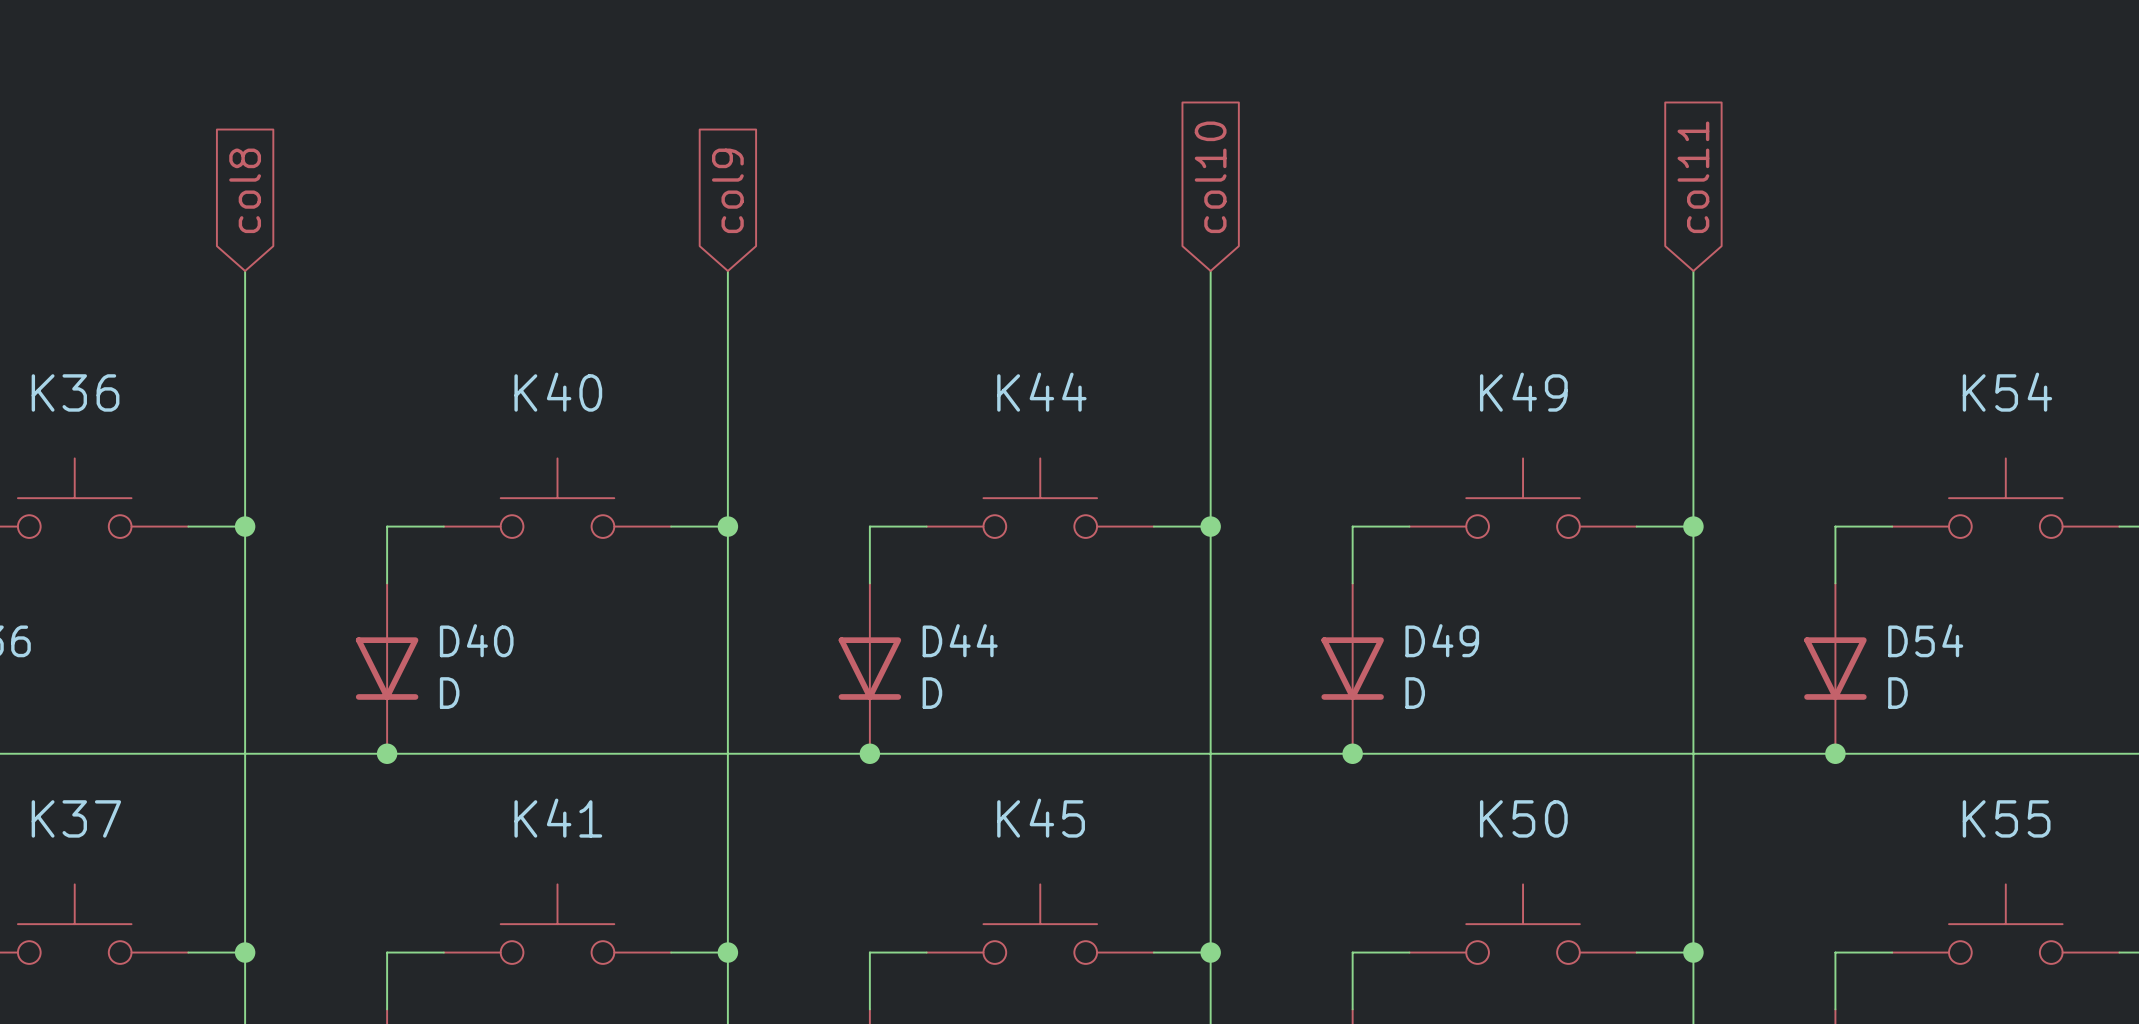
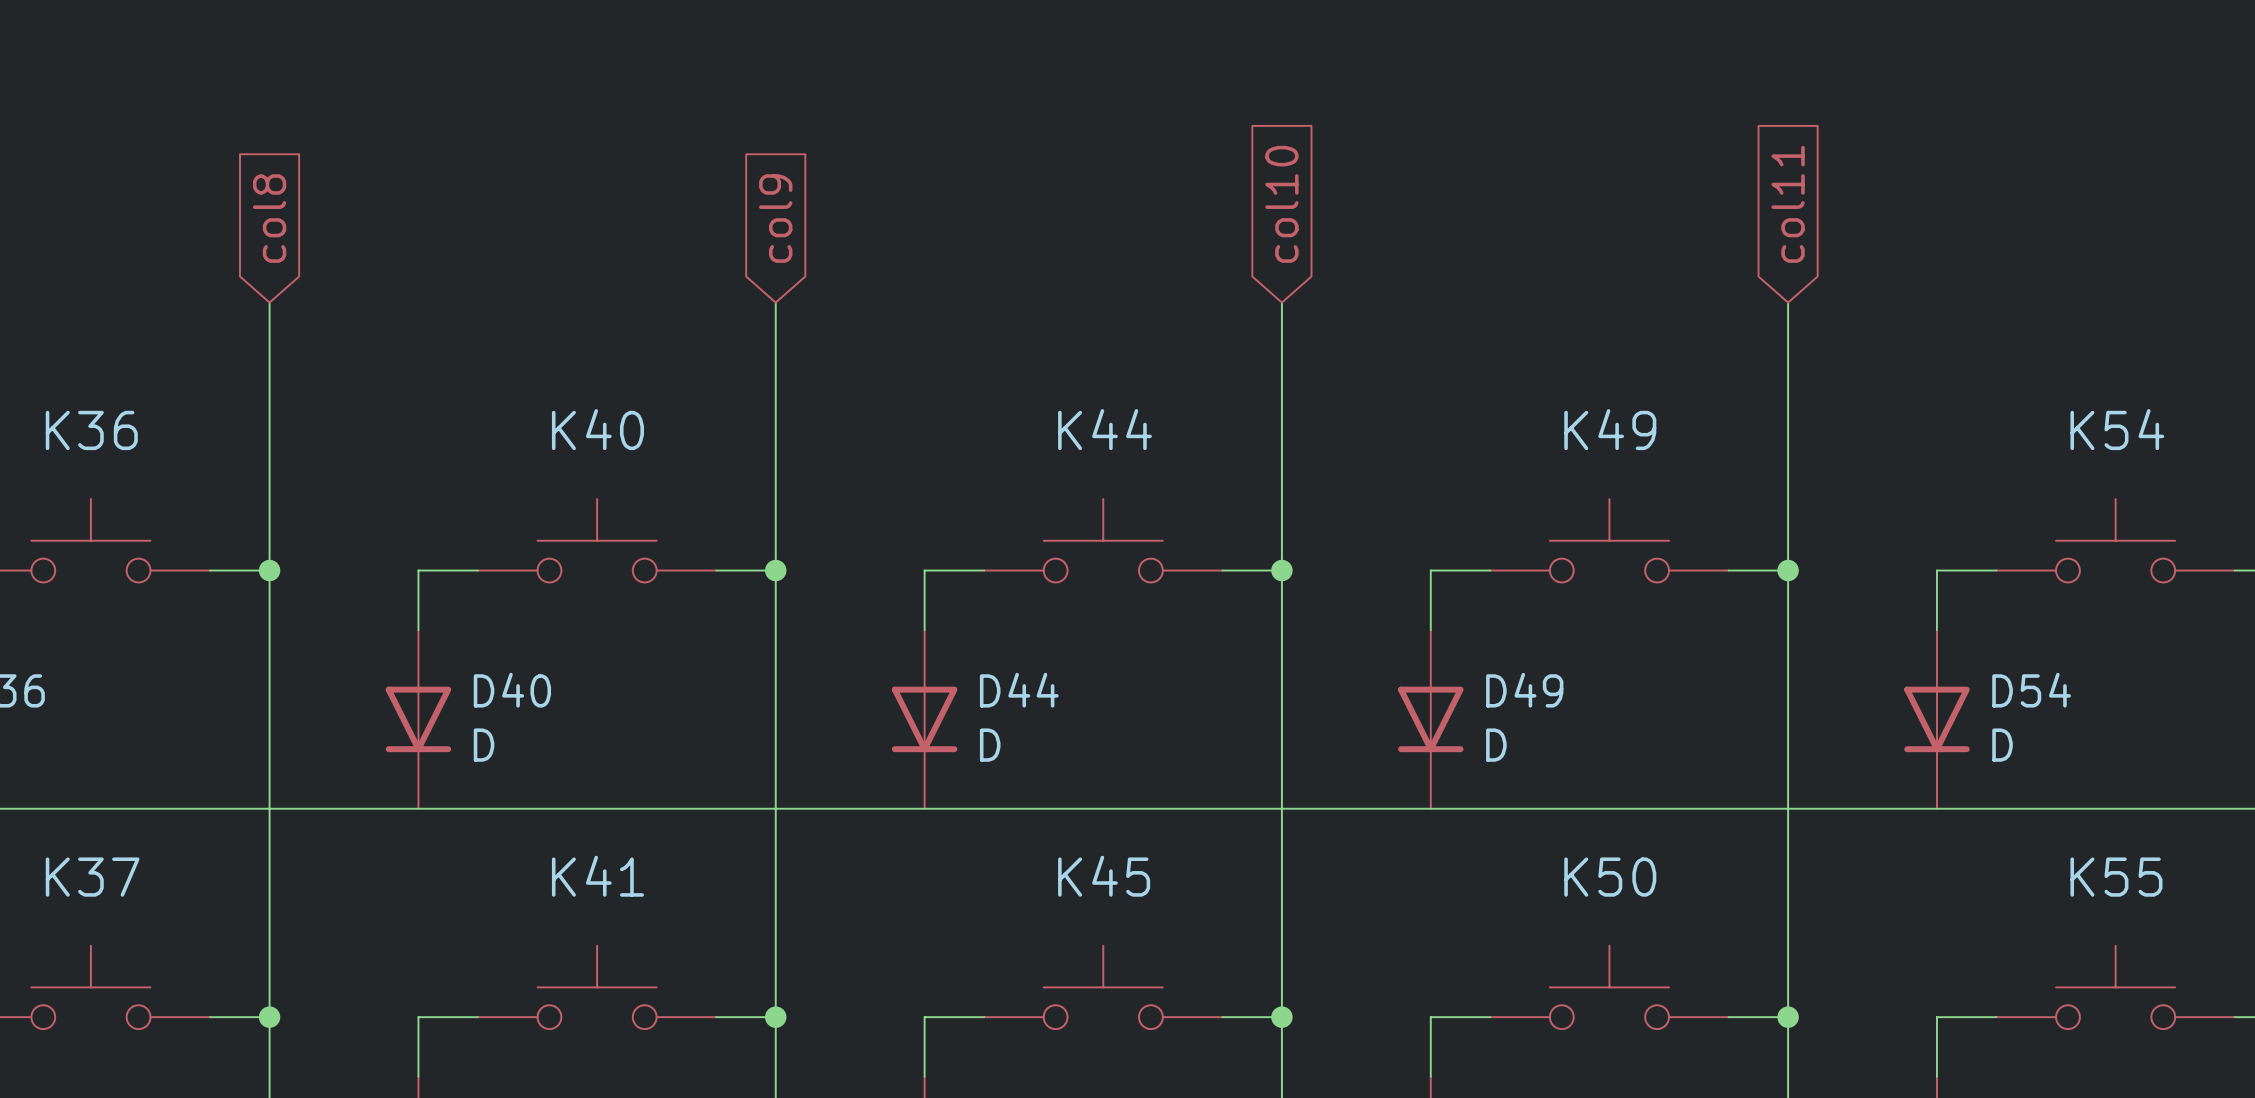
junction: (387, 753) -> none
junction: (869, 753) -> none
junction: (1352, 753) -> none
junction: (1835, 753) -> none

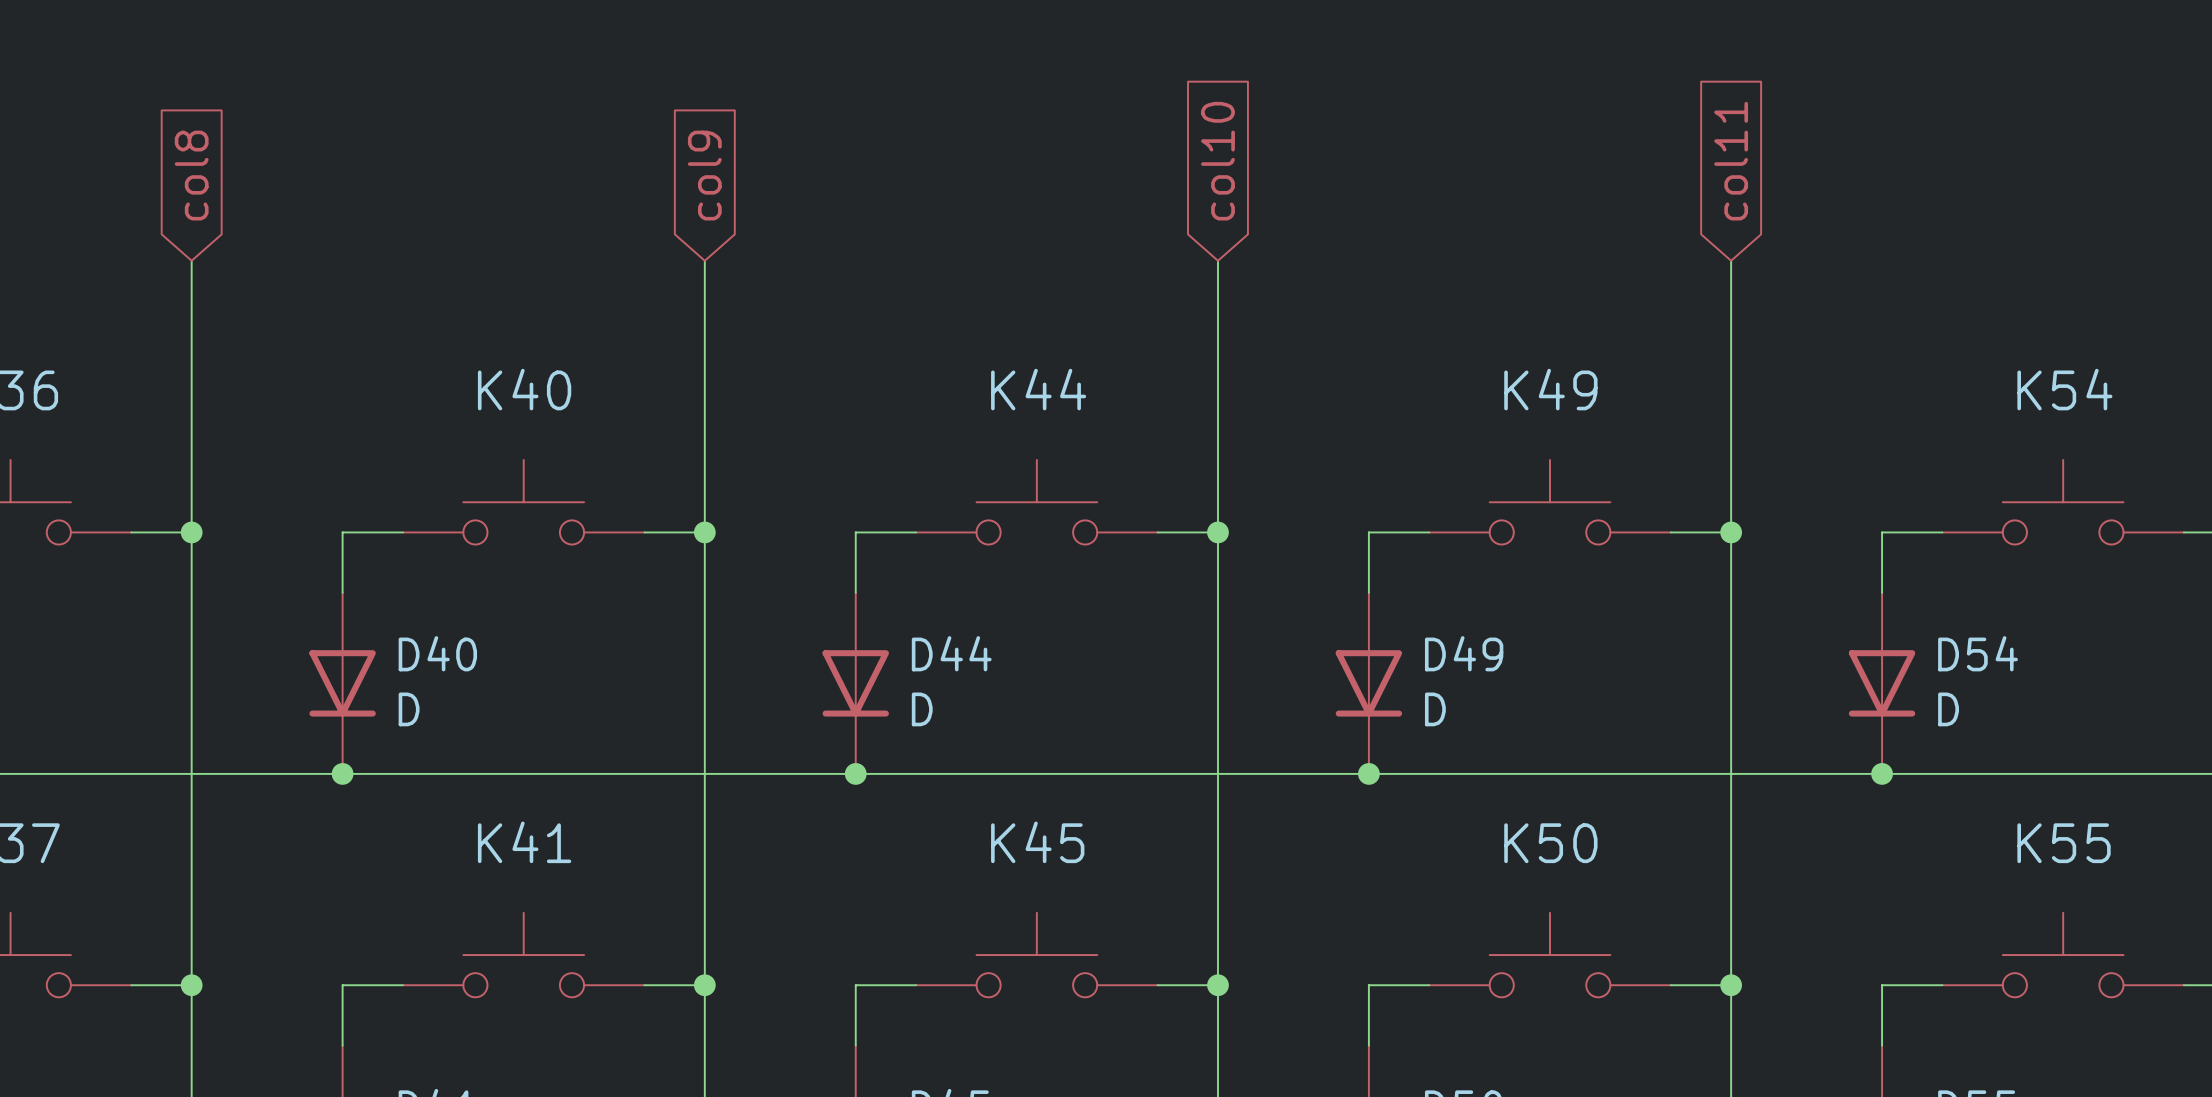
junction: none -> (342, 773)
junction: none -> (855, 773)
junction: none -> (1368, 773)
junction: none -> (1882, 773)

